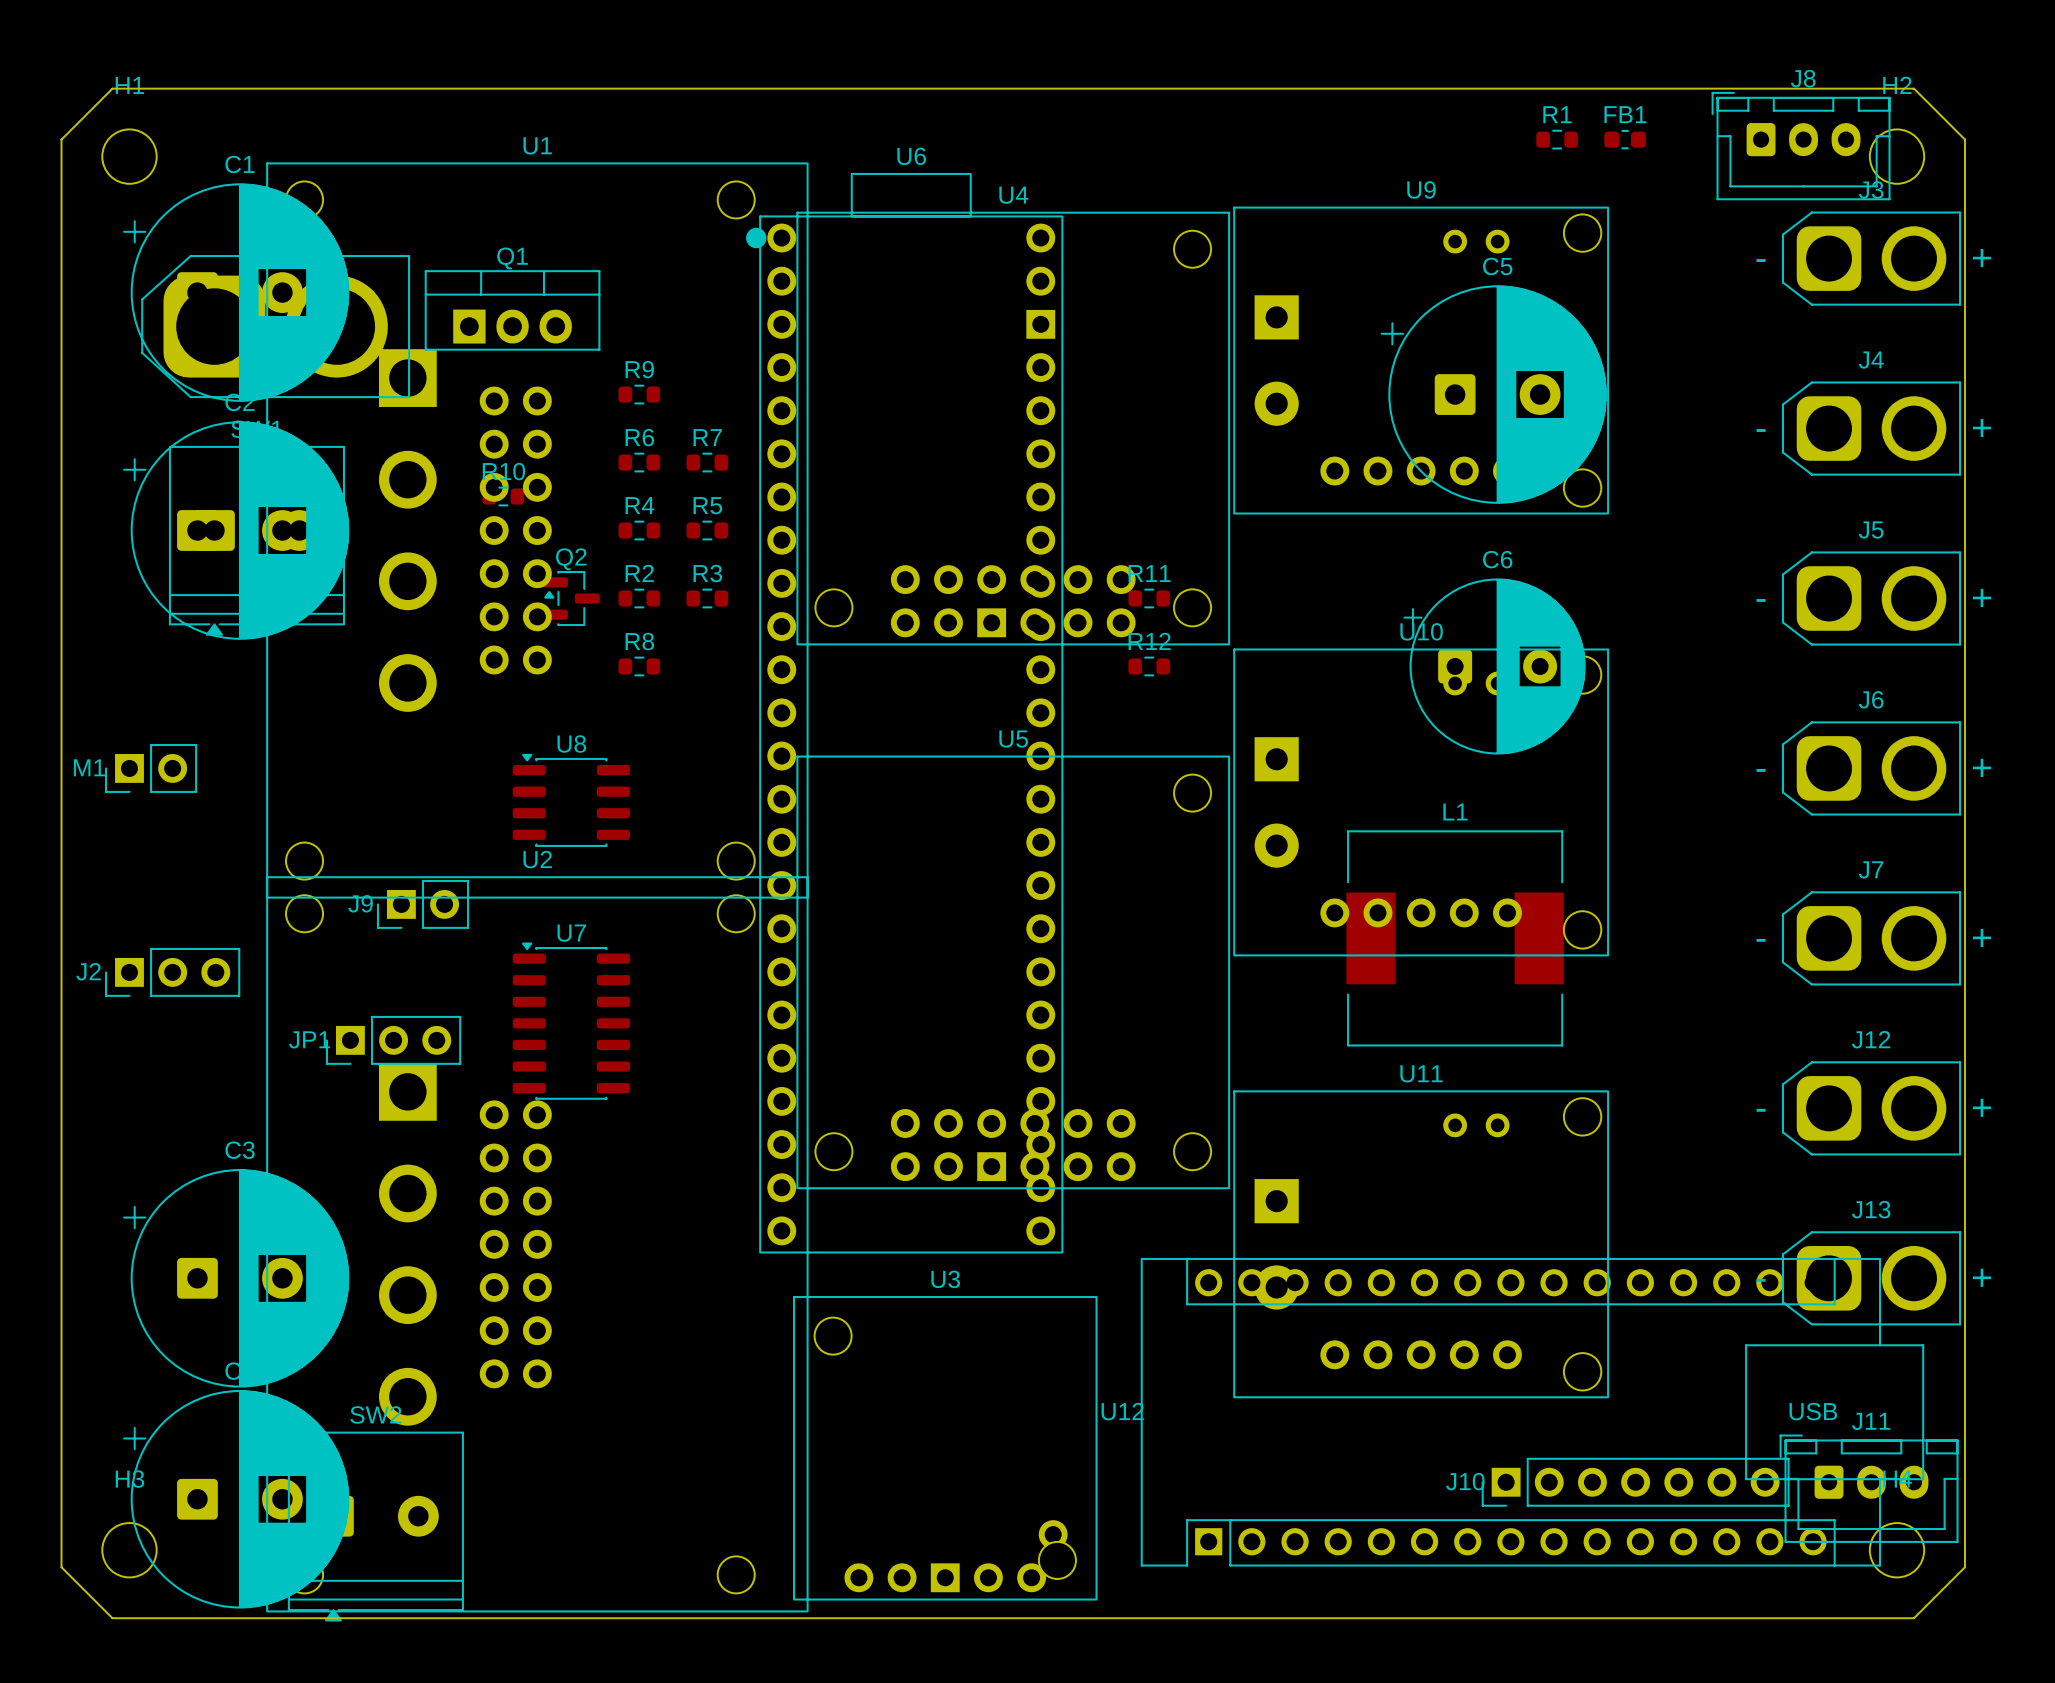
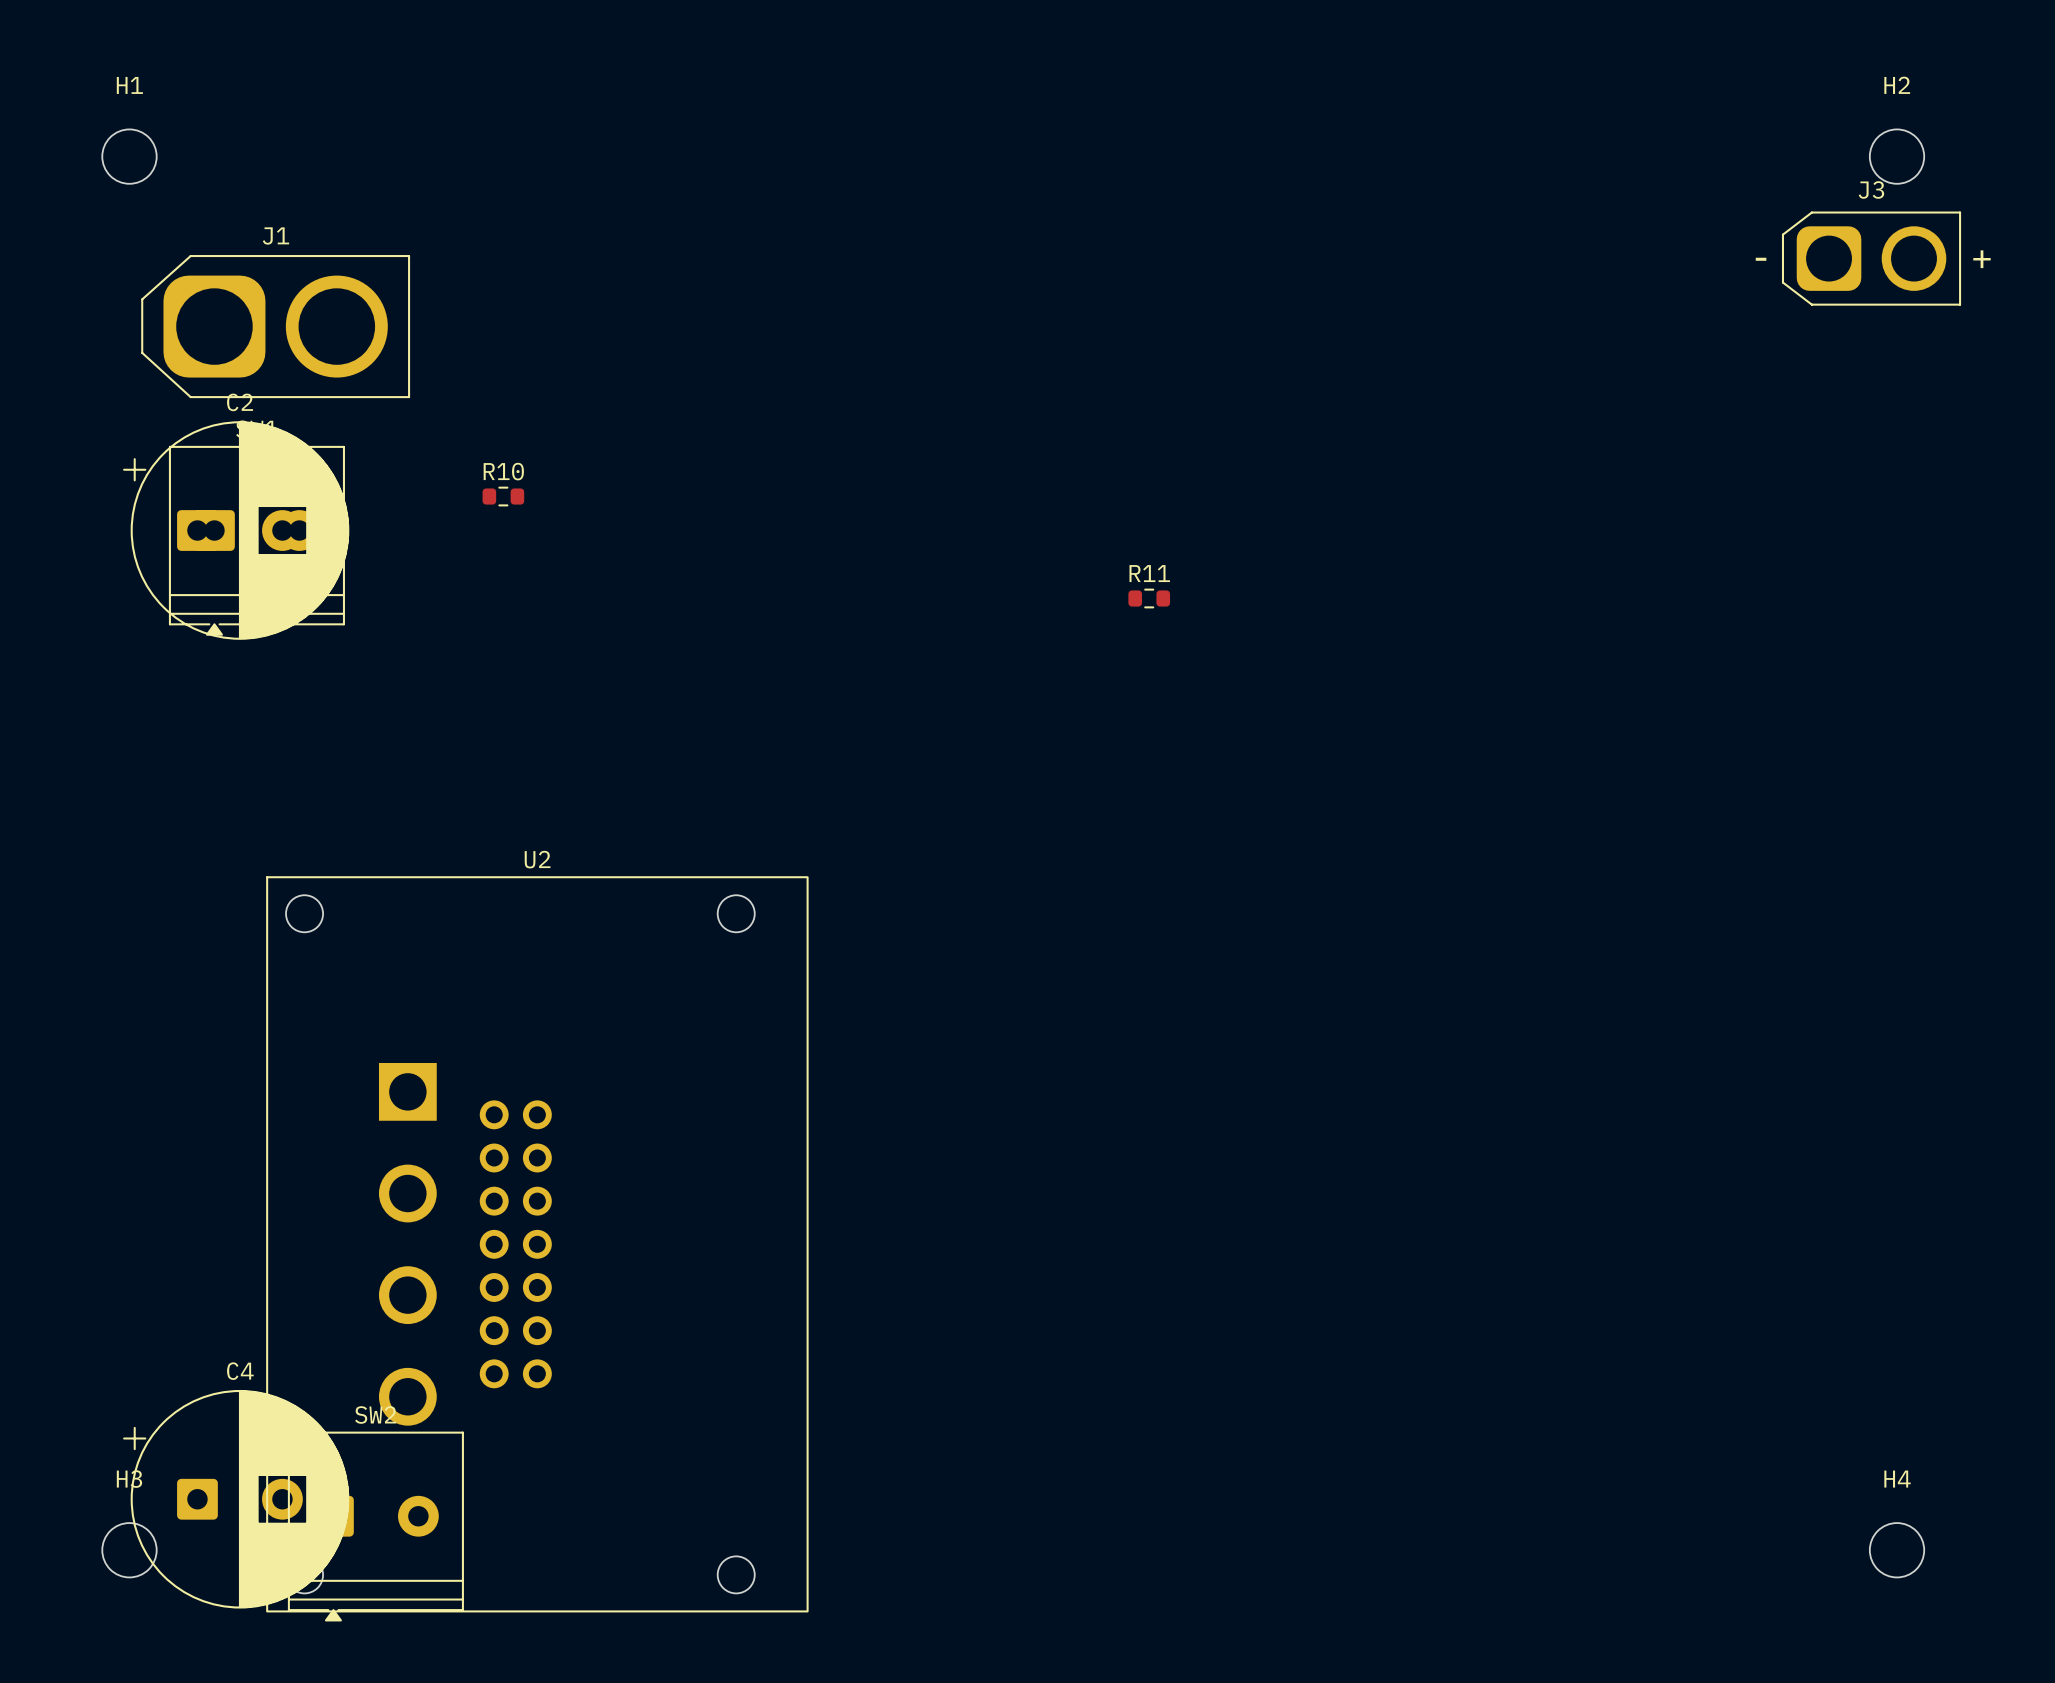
board edge: (112, 88) (1914, 88) (1964, 139) (1964, 1567) (1914, 1618) (112, 1618) (61, 1567) (61, 139) (112, 88) -> none
R1: (1557, 139) -> none
FB1: (1625, 139) -> none
J8: (1801, 146) -> none
C1: (236, 292) -> none
Q1: (512, 310) -> none
U9: (1421, 360) -> none
R9: (639, 394) -> none
C5: (1493, 394) -> none
U4: (1013, 428) -> none
J4: (1871, 428) -> none
R6: (639, 462) -> none
R7: (707, 462) -> none
U1: (537, 530) -> none
R4: (639, 530) -> none
R5: (707, 530) -> none
Q2: (571, 598) -> none
R2: (639, 598) -> none
R3: (707, 598) -> none
J5: (1871, 598) -> none
R8: (639, 666) -> none
R12: (1149, 666) -> none
C6: (1494, 666) -> none
U6: (904, 713) -> none
M1: (151, 768) -> none
J6: (1871, 768) -> none
U8: (571, 800) -> none
U10: (1421, 802) -> none
J9: (422, 904) -> none
L1: (1455, 938) -> none
J7: (1871, 938) -> none
J2: (172, 972) -> none
U5: (1013, 972) -> none
U7: (571, 1021) -> none
JP1: (393, 1040) -> none
J12: (1871, 1108) -> none
U11: (1421, 1244) -> none
C3: (236, 1278) -> none
J13: (1871, 1278) -> none
U12: (1532, 1412) -> none
U3: (945, 1448) -> none
J10: (1635, 1482) -> none
J11: (1869, 1488) -> none

